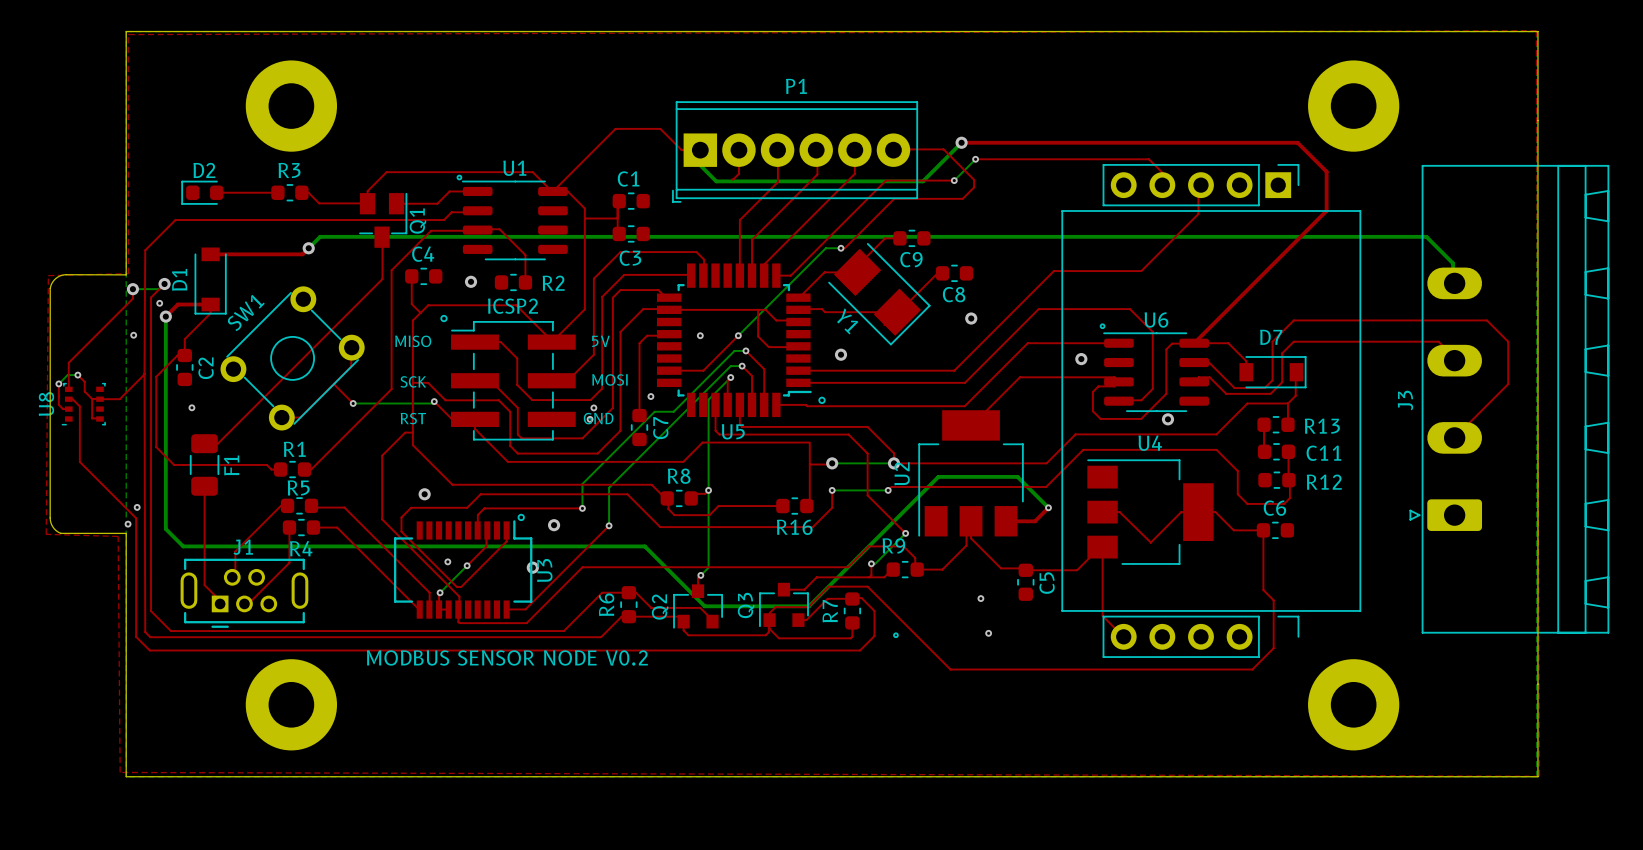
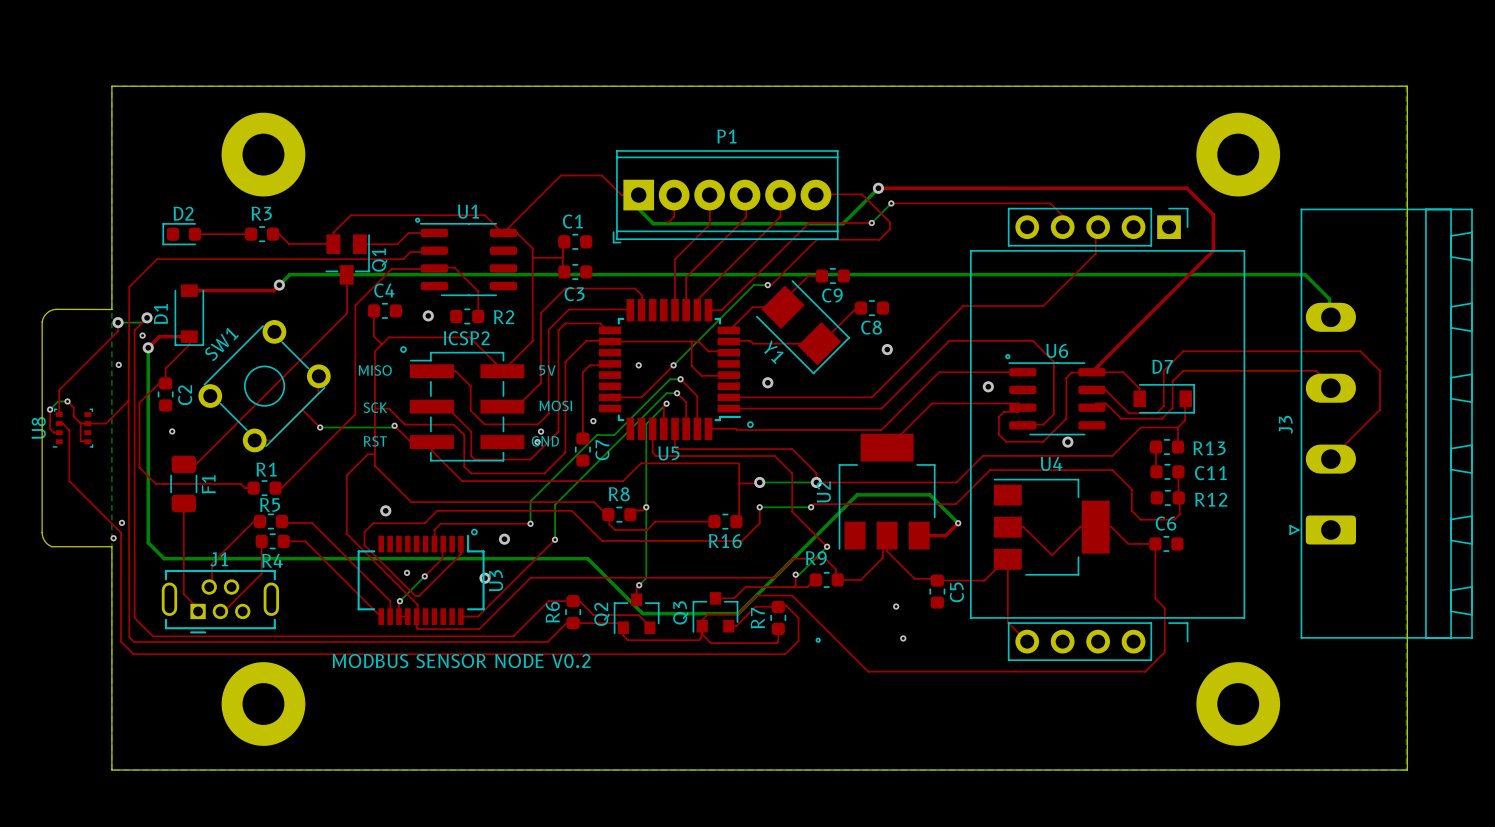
top zone outline: (1536, 30) (128, 34) (128, 273) (48, 275) (46, 534) (118, 536) (120, 772) (1539, 776) (1536, 30) -> none

